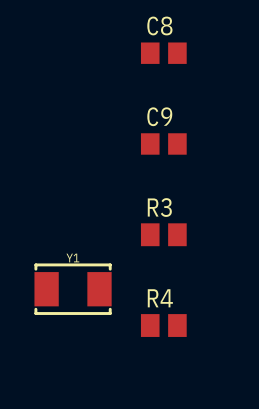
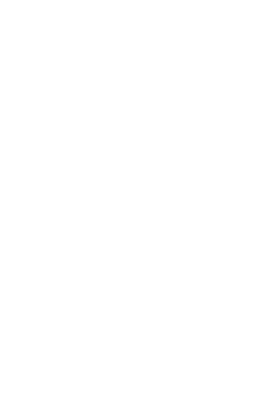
C8: (163, 53) -> none
C9: (163, 143) -> none
R3: (163, 234) -> none
Y1: (73, 289) -> none
R4: (163, 325) -> none

